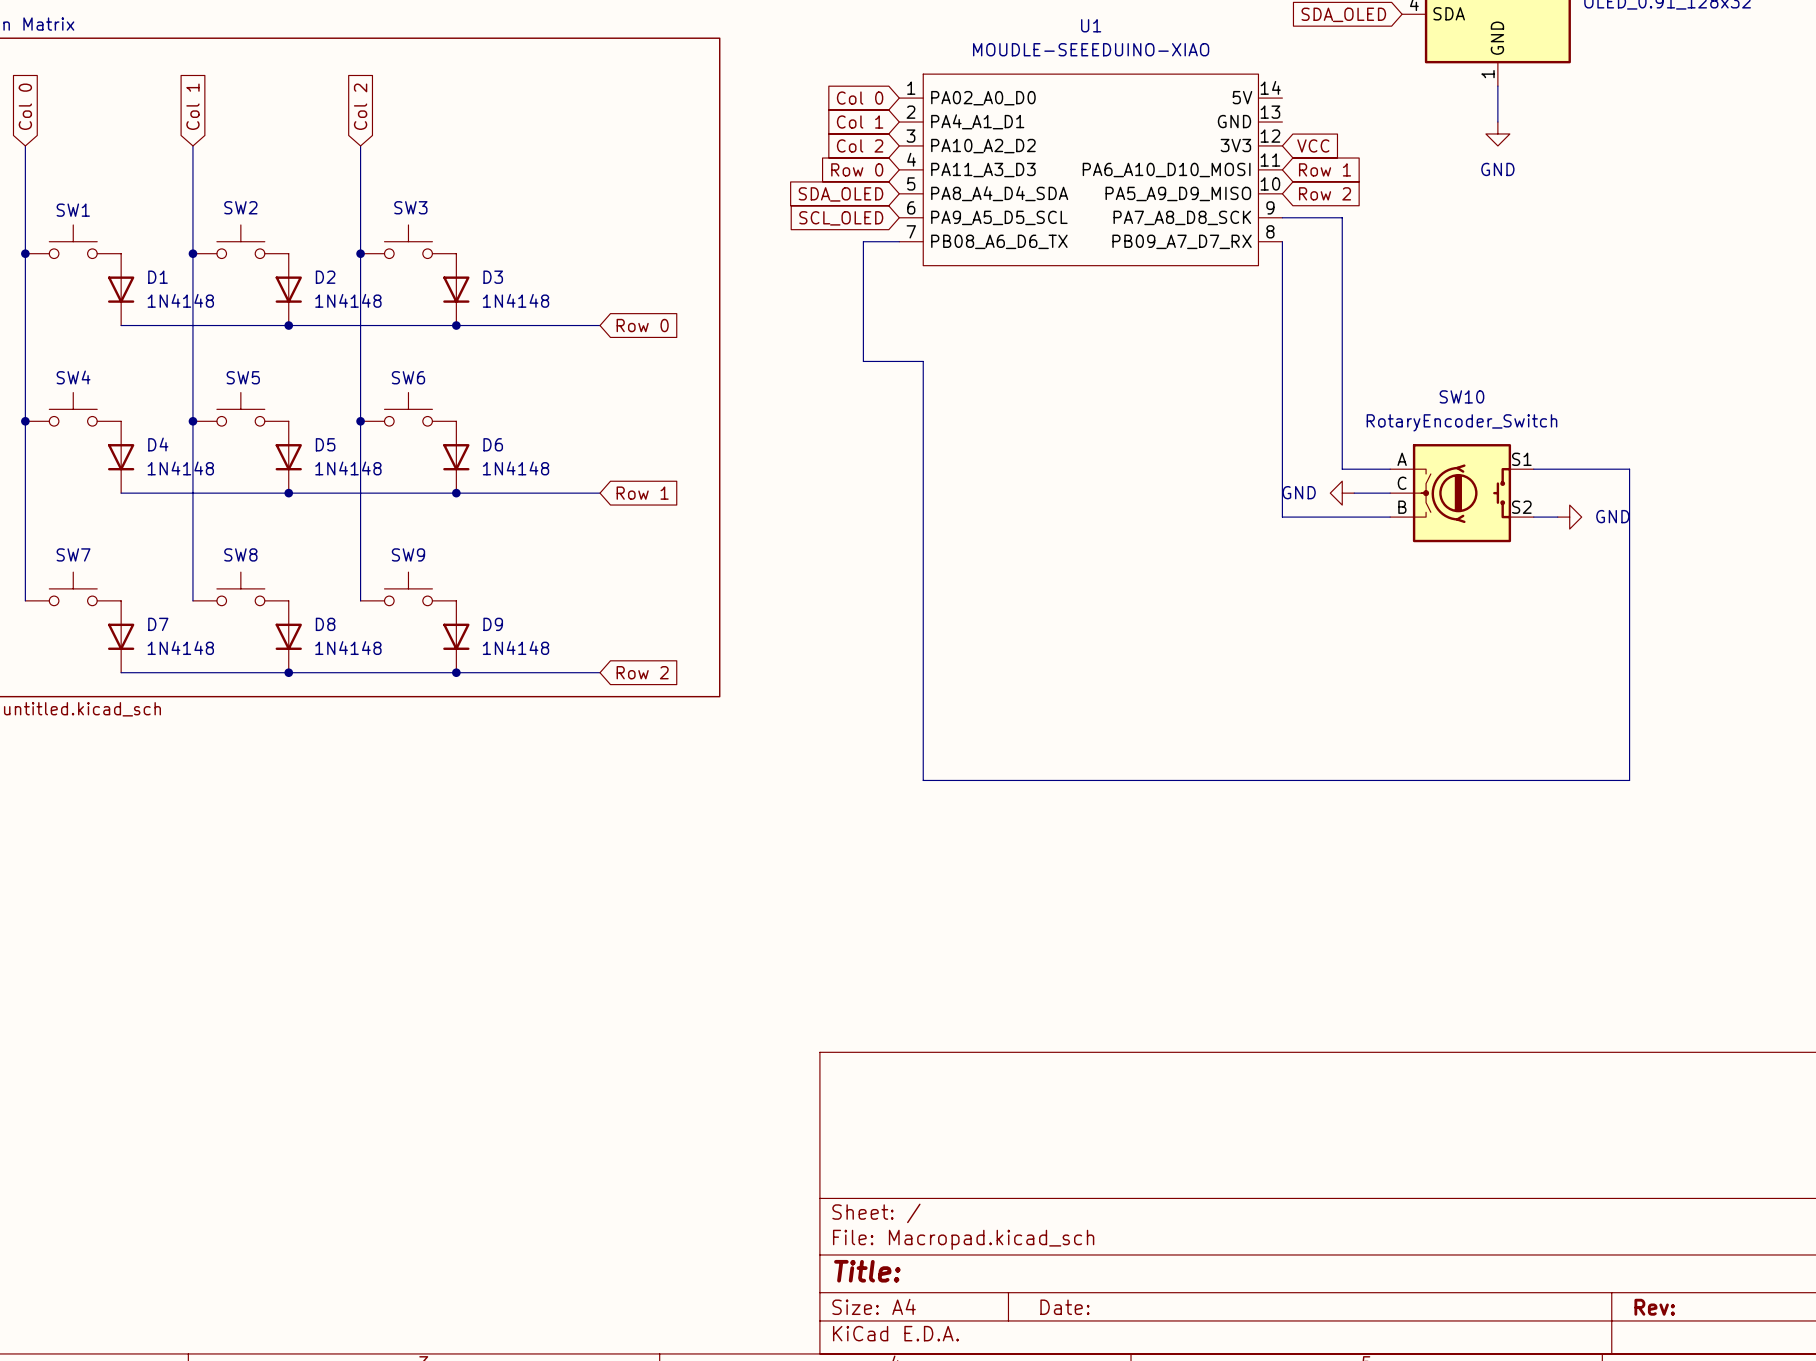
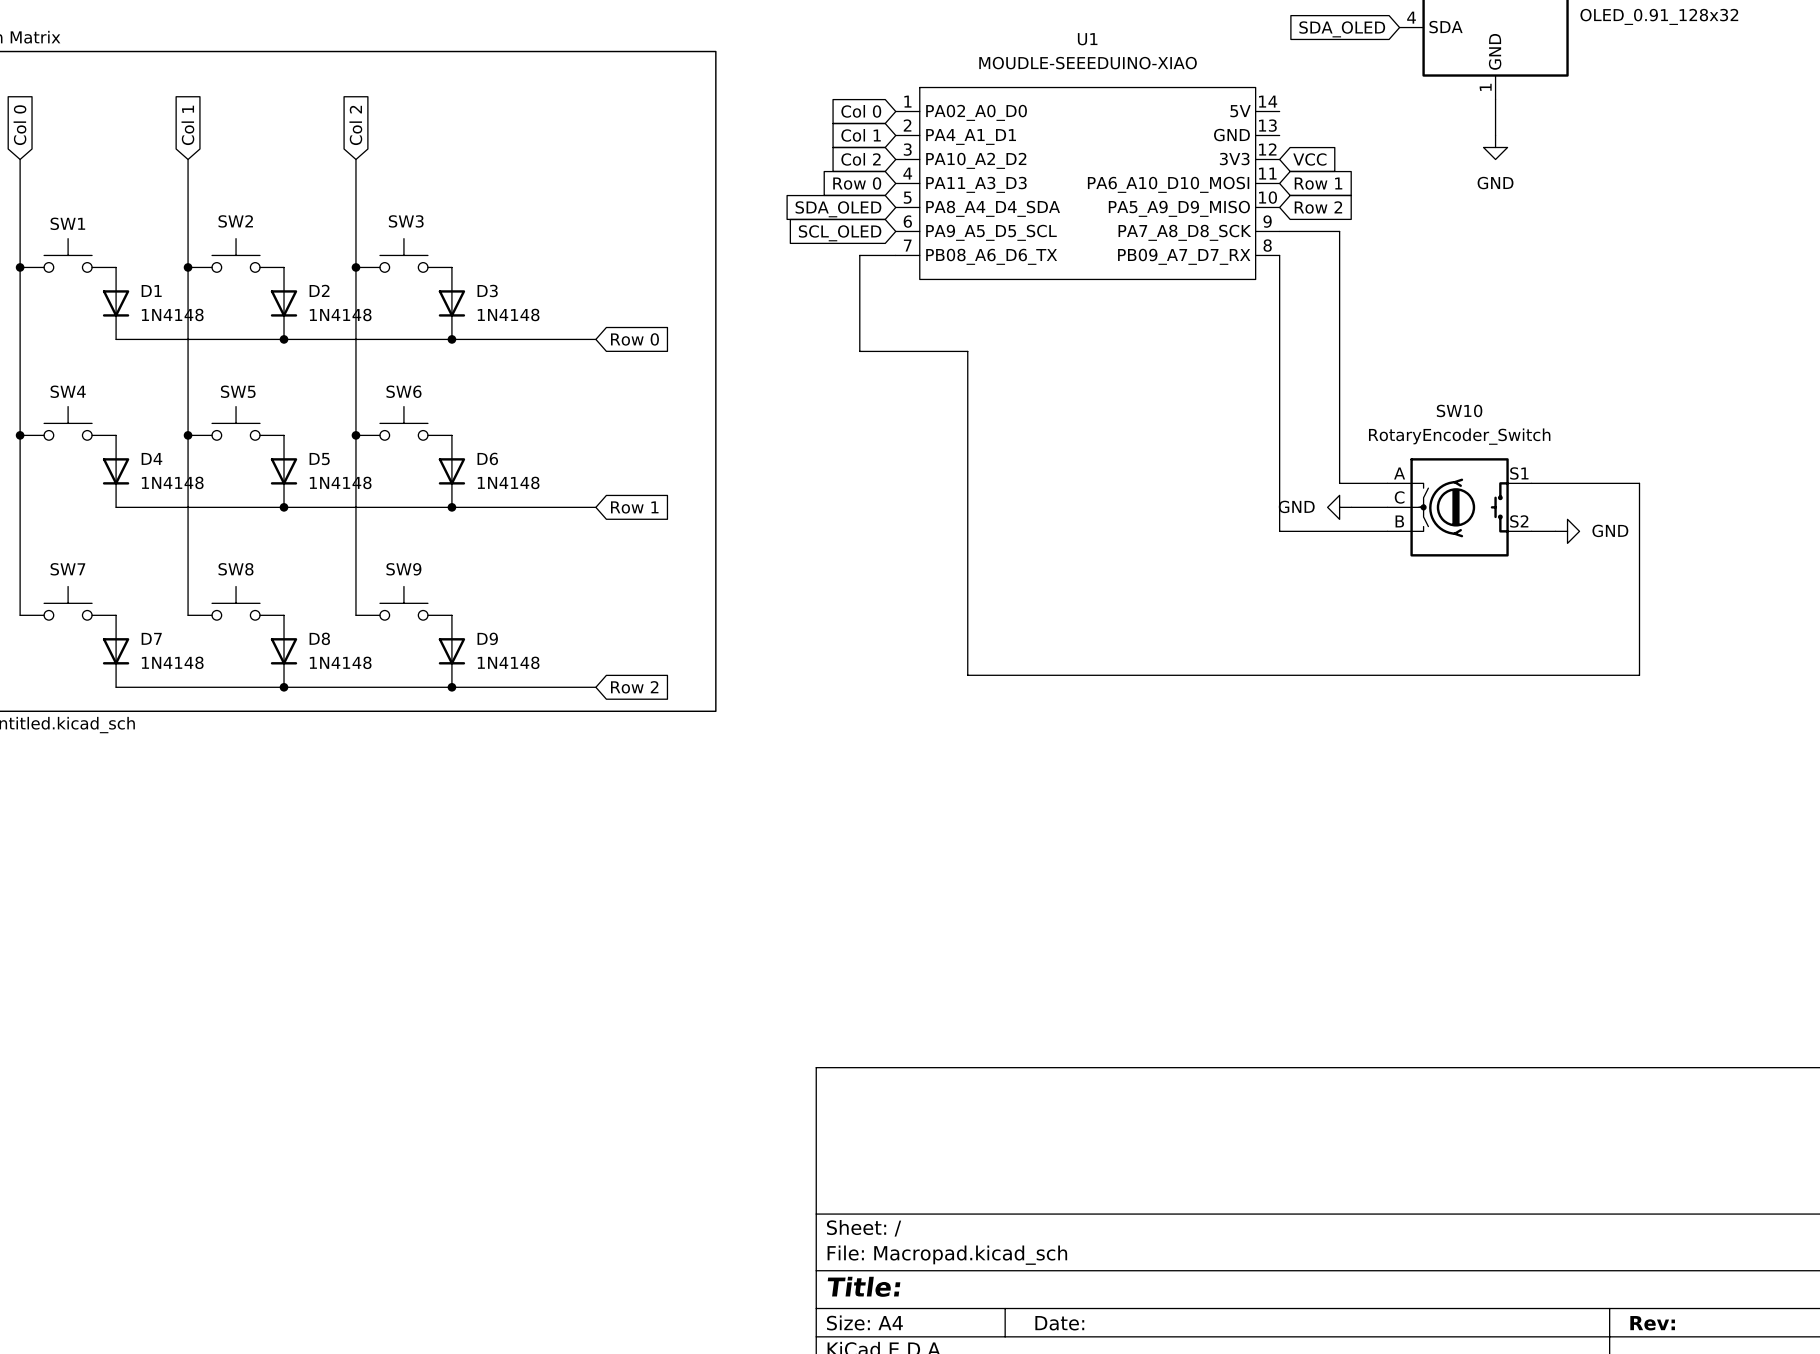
wire: (863, 337) (863, 361) (923, 361) (923, 780) (1629, 780) (1629, 469) -> (859, 351) (967, 351) (967, 675) (1639, 675) (1639, 483) (1627, 483)

